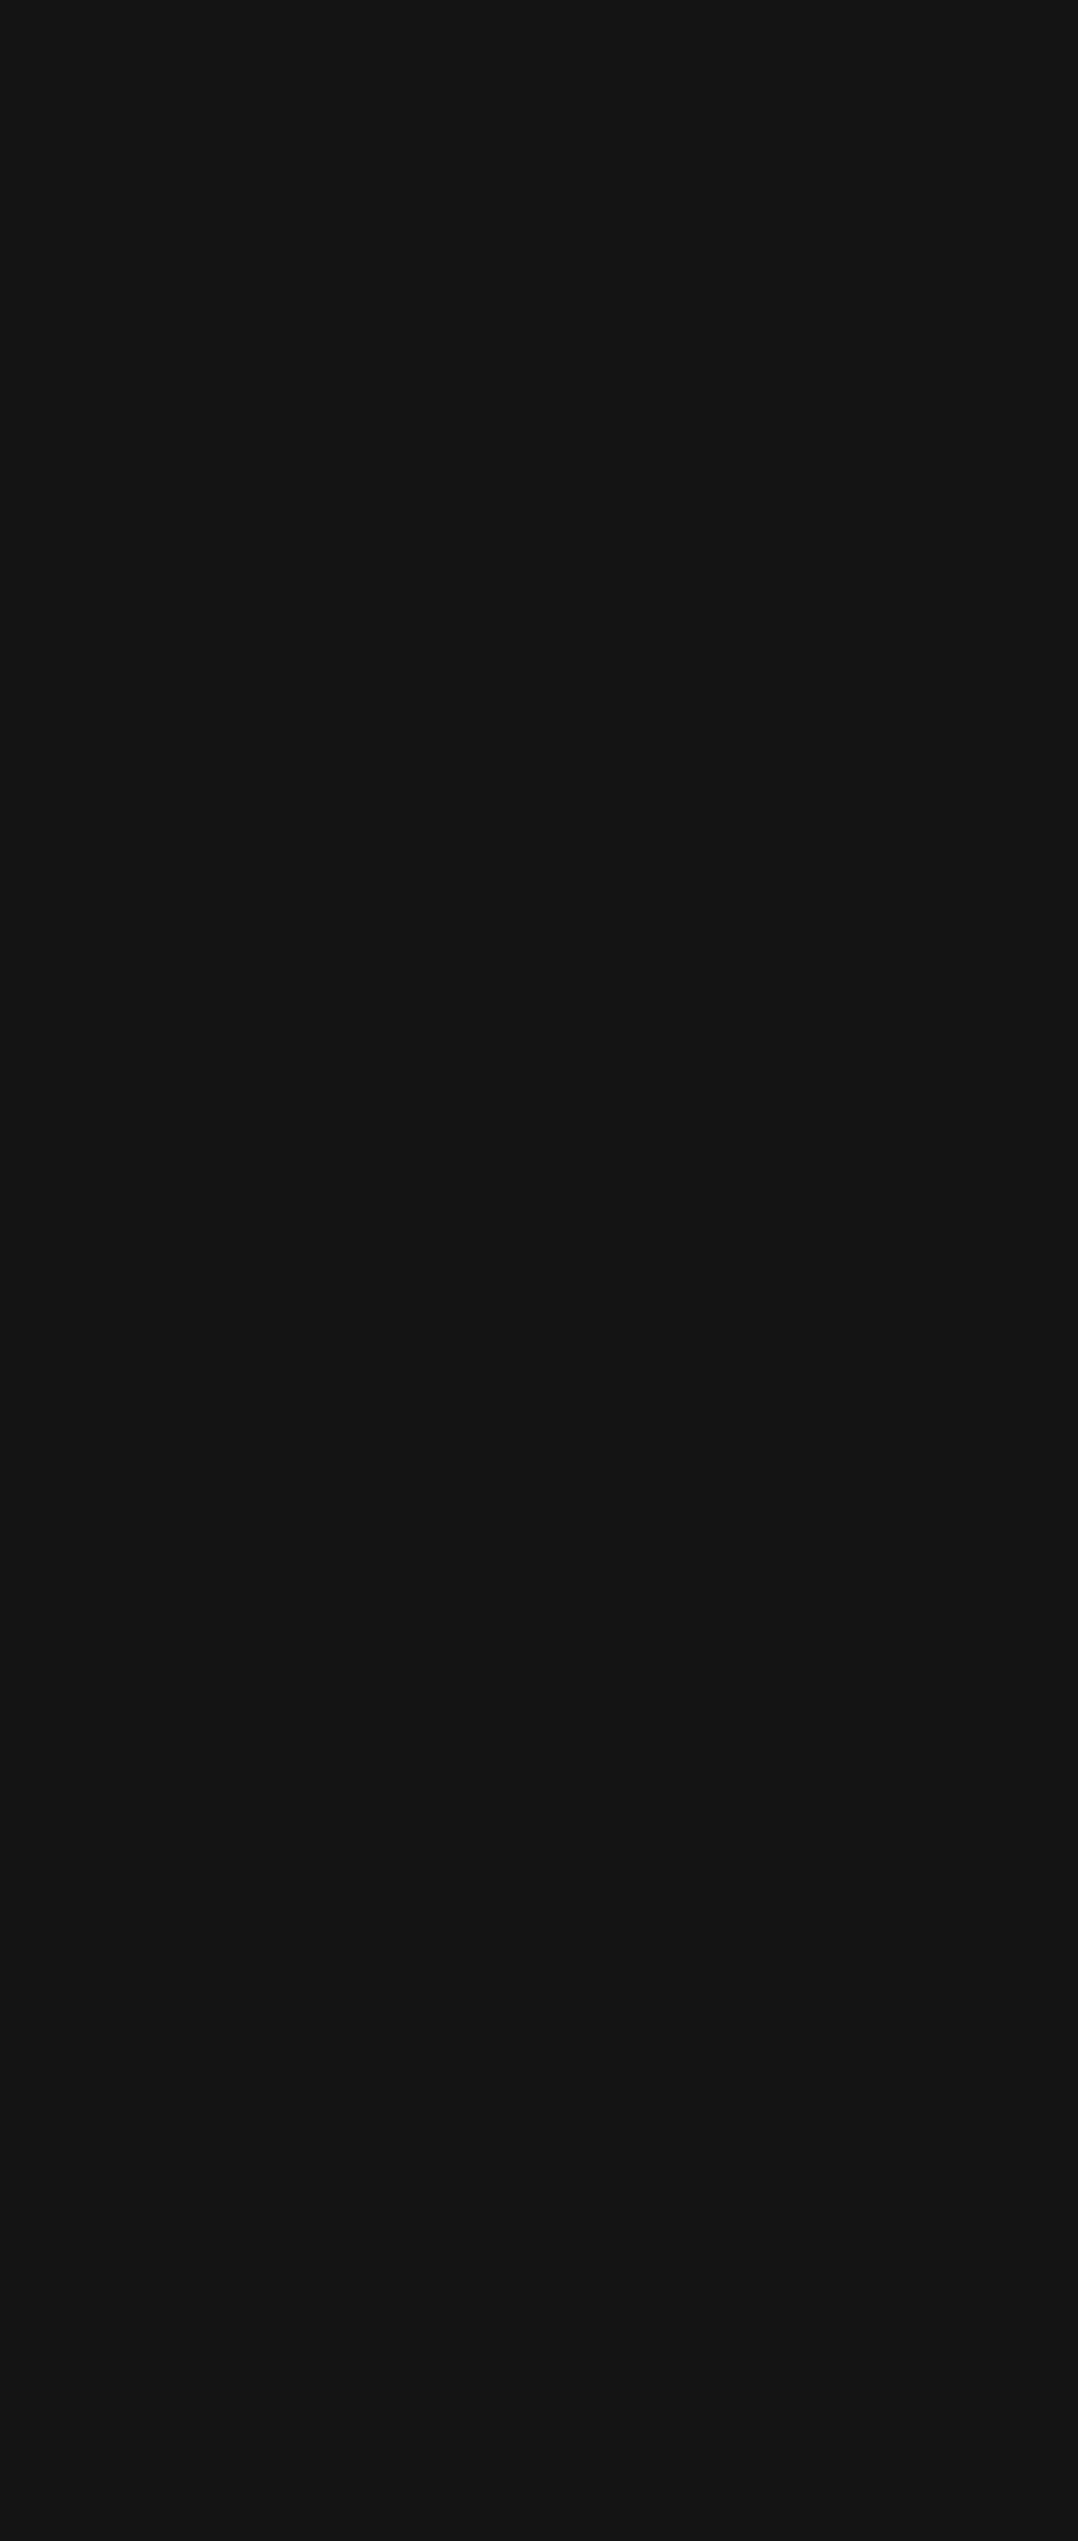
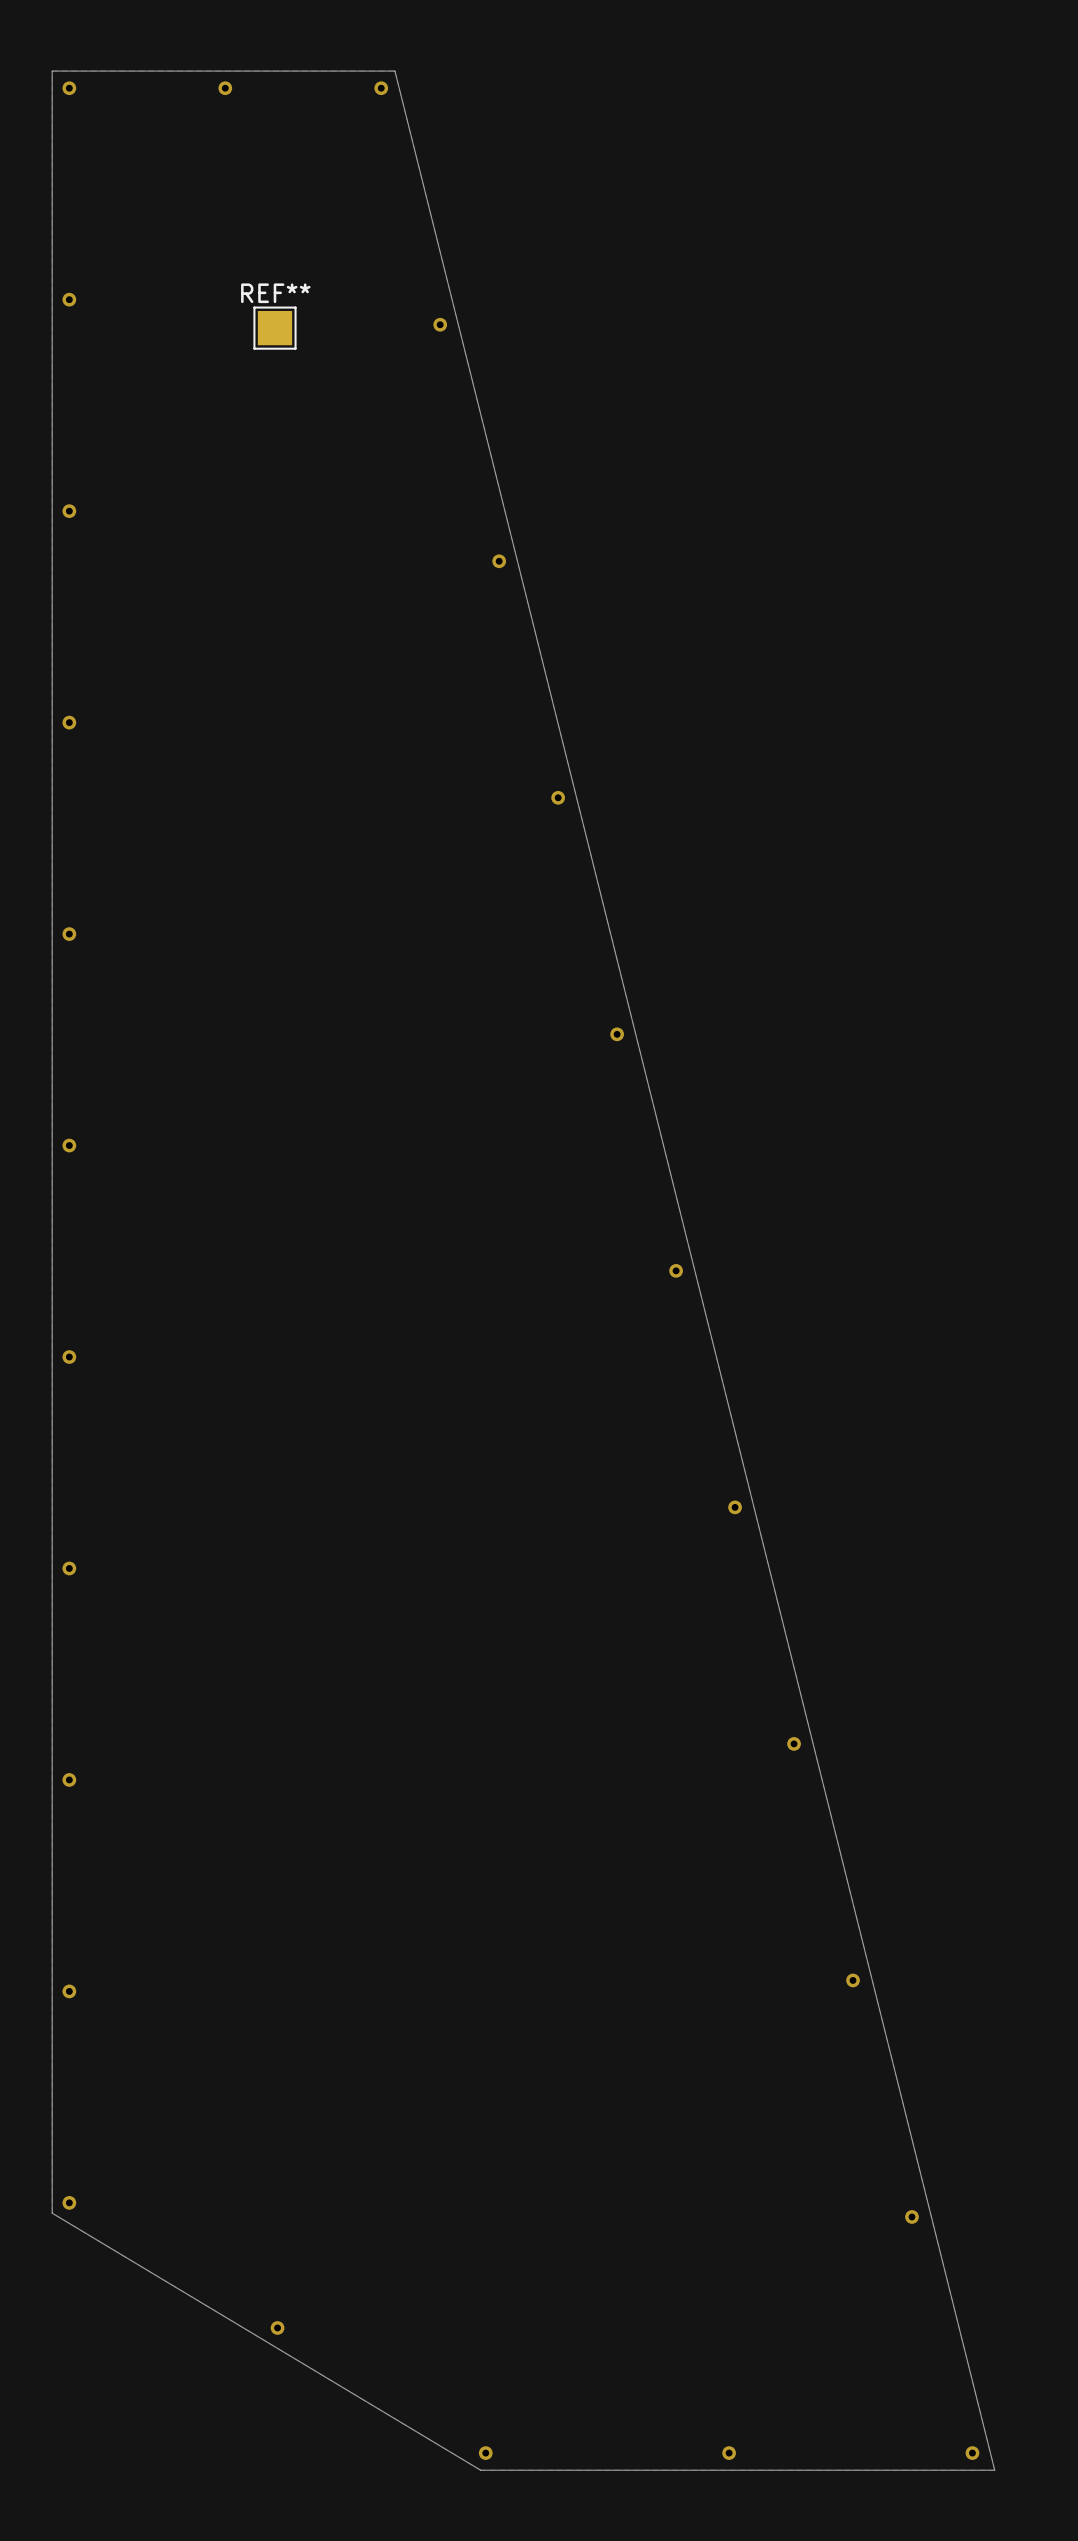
board edge: none -> (52, 71) (52, 2213) (480, 2470) (994, 2470) (394, 71) (52, 71)
via: none -> (69, 88)
via: none -> (225, 88)
via: none -> (381, 88)
via: none -> (69, 299)
via: none -> (440, 324)
REF**: none -> (274, 328)
via: none -> (69, 511)
via: none -> (499, 561)
via: none -> (69, 722)
via: none -> (558, 797)
via: none -> (69, 934)
via: none -> (617, 1034)
via: none -> (69, 1145)
via: none -> (676, 1270)
via: none -> (69, 1357)
via: none -> (735, 1507)
via: none -> (69, 1568)
via: none -> (794, 1743)
via: none -> (69, 1779)
via: none -> (853, 1980)
via: none -> (69, 1991)
via: none -> (69, 2202)
via: none -> (911, 2216)
via: none -> (277, 2327)
via: none -> (485, 2453)
via: none -> (729, 2453)
via: none -> (972, 2453)

